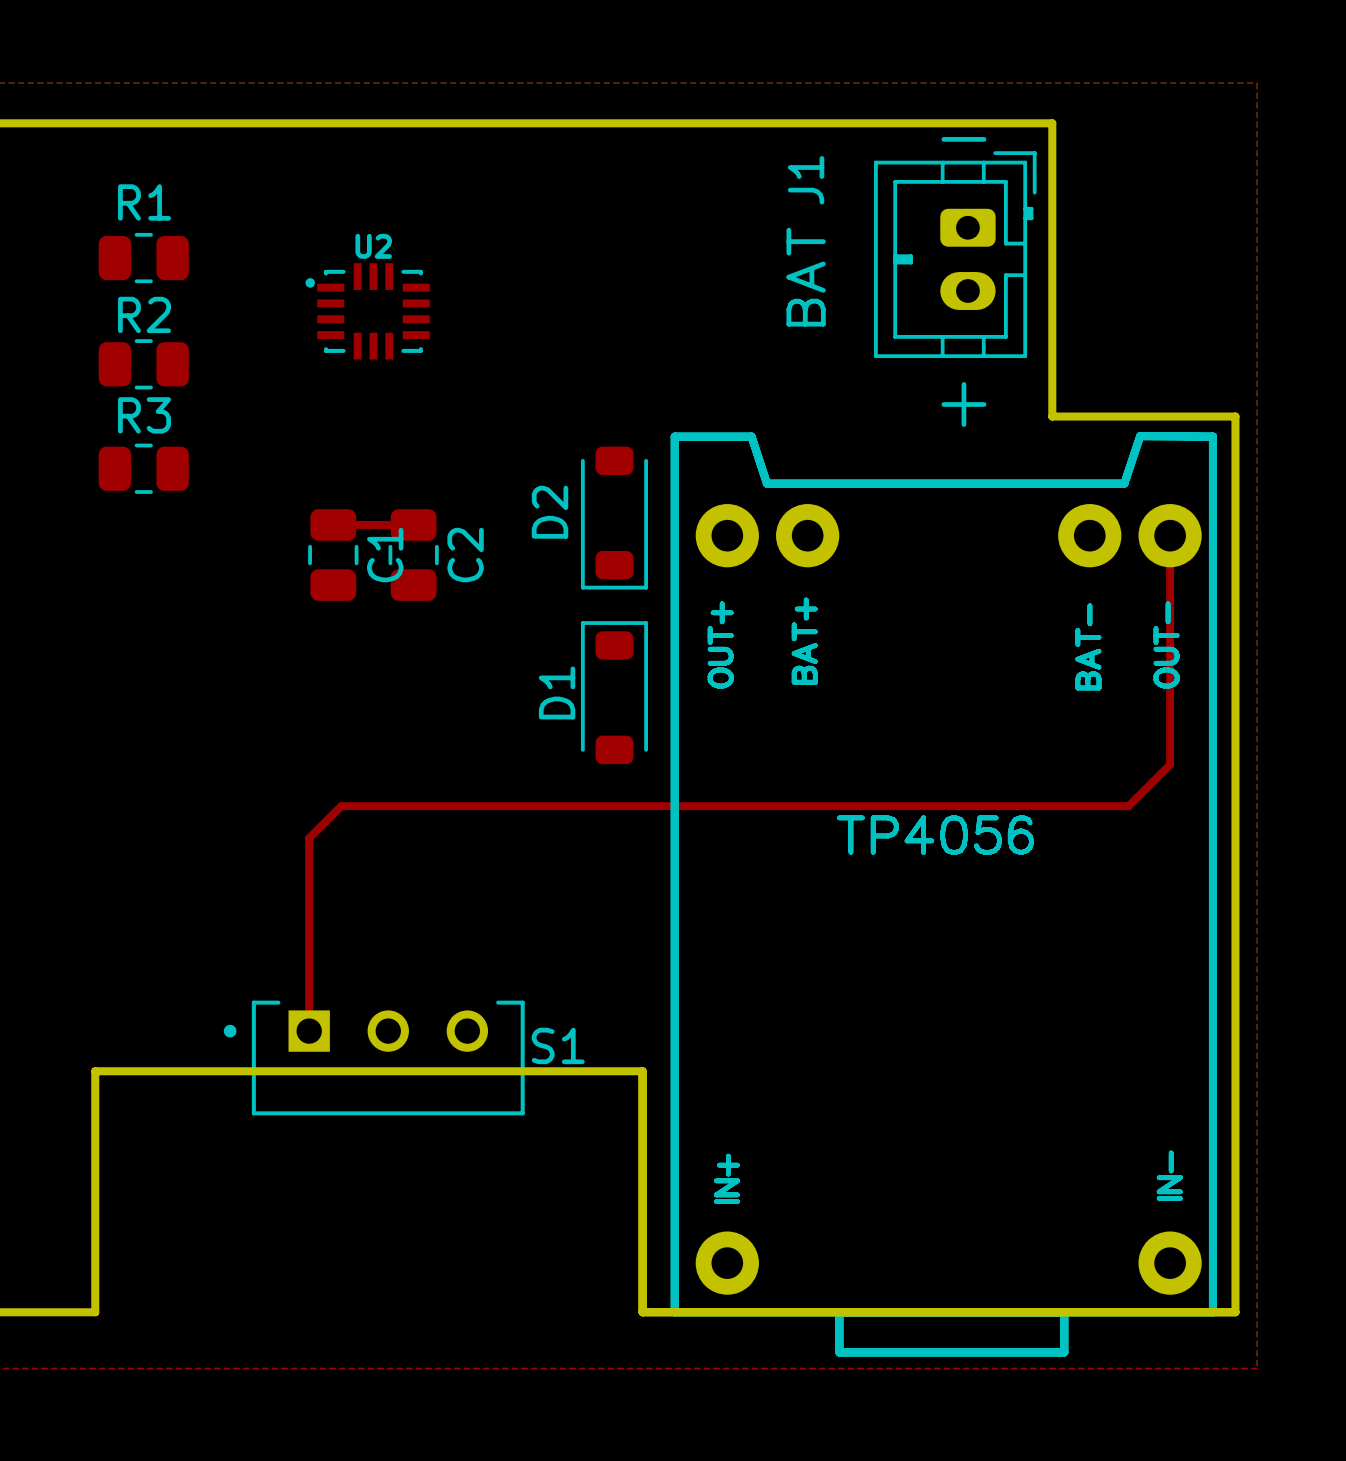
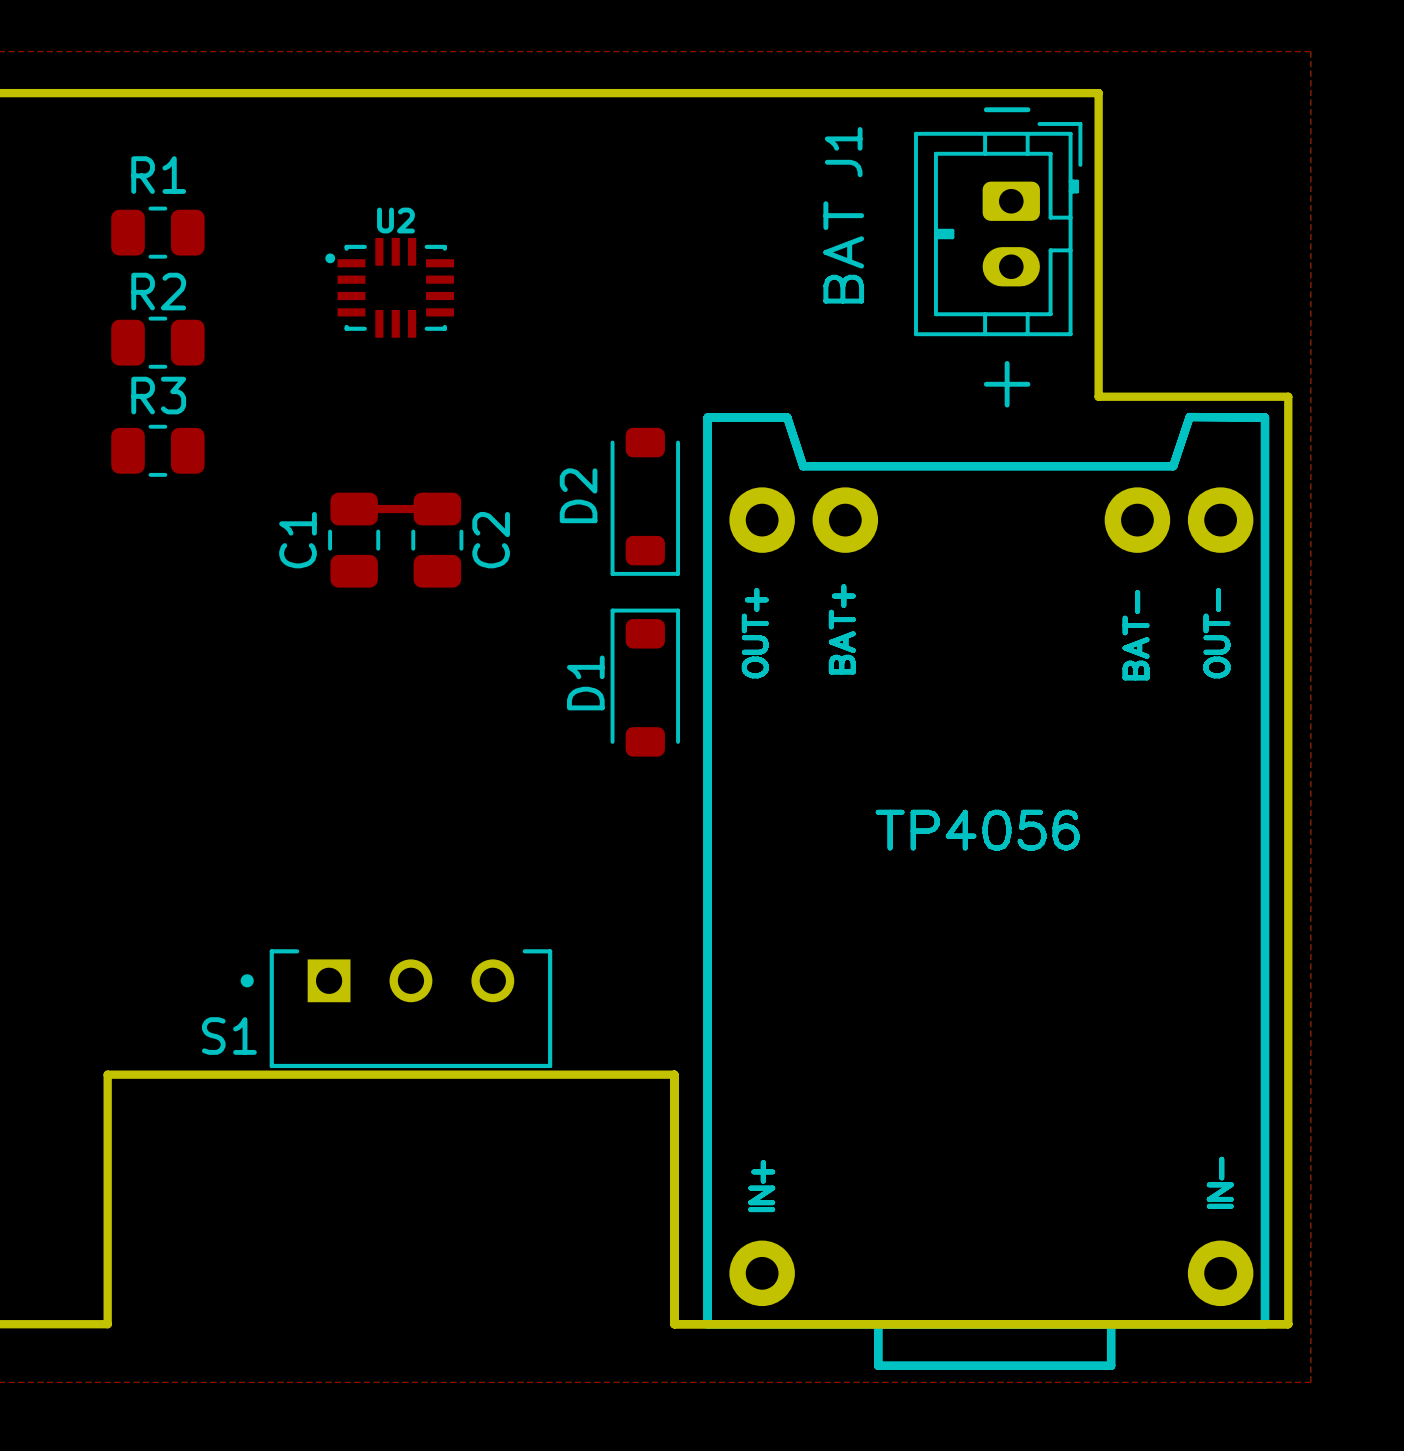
top track: (1170, 535) (1170, 764) (1128, 806) (341, 806) (309, 838) (309, 1031) -> none
C1 name position: C1 (385, 555) -> C1 (298, 540)
S1 name position: S1 (558, 1045) -> S1 (229, 1036)
S1 position: (374, 1057) -> (396, 1008)

